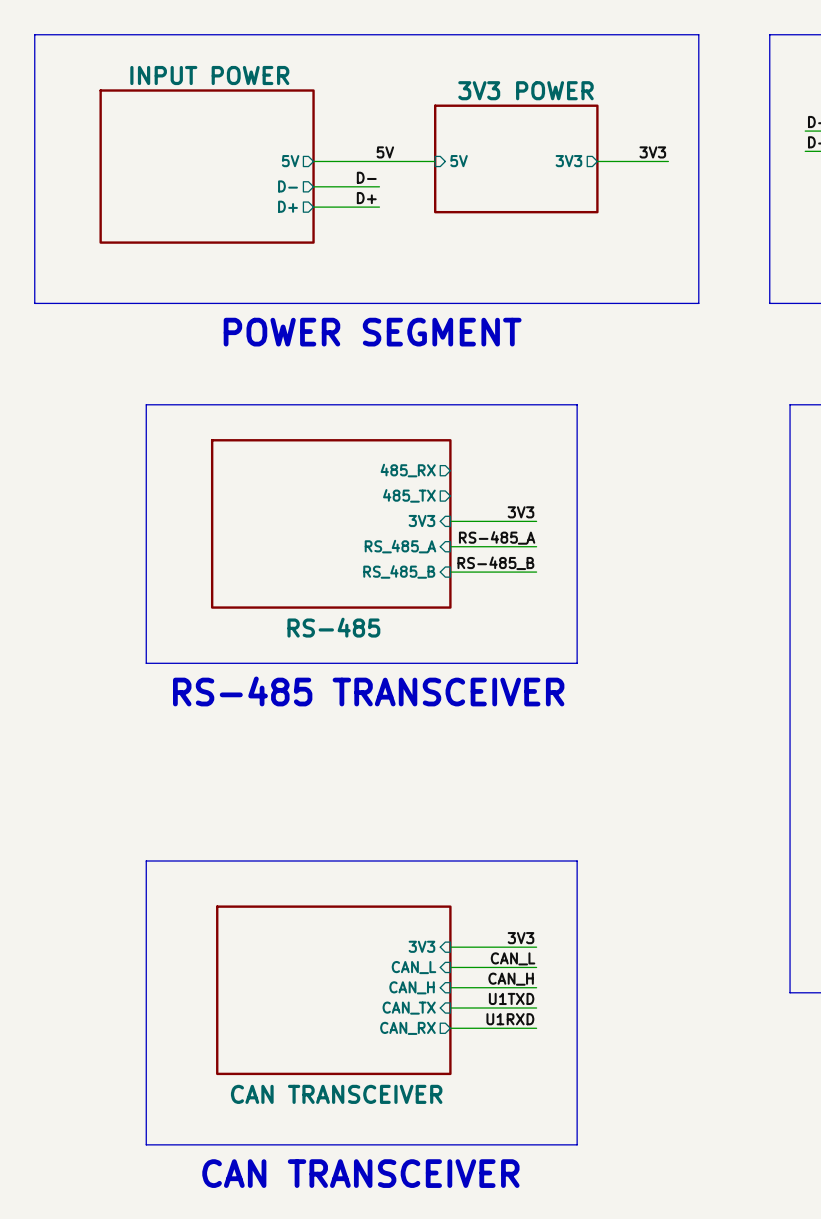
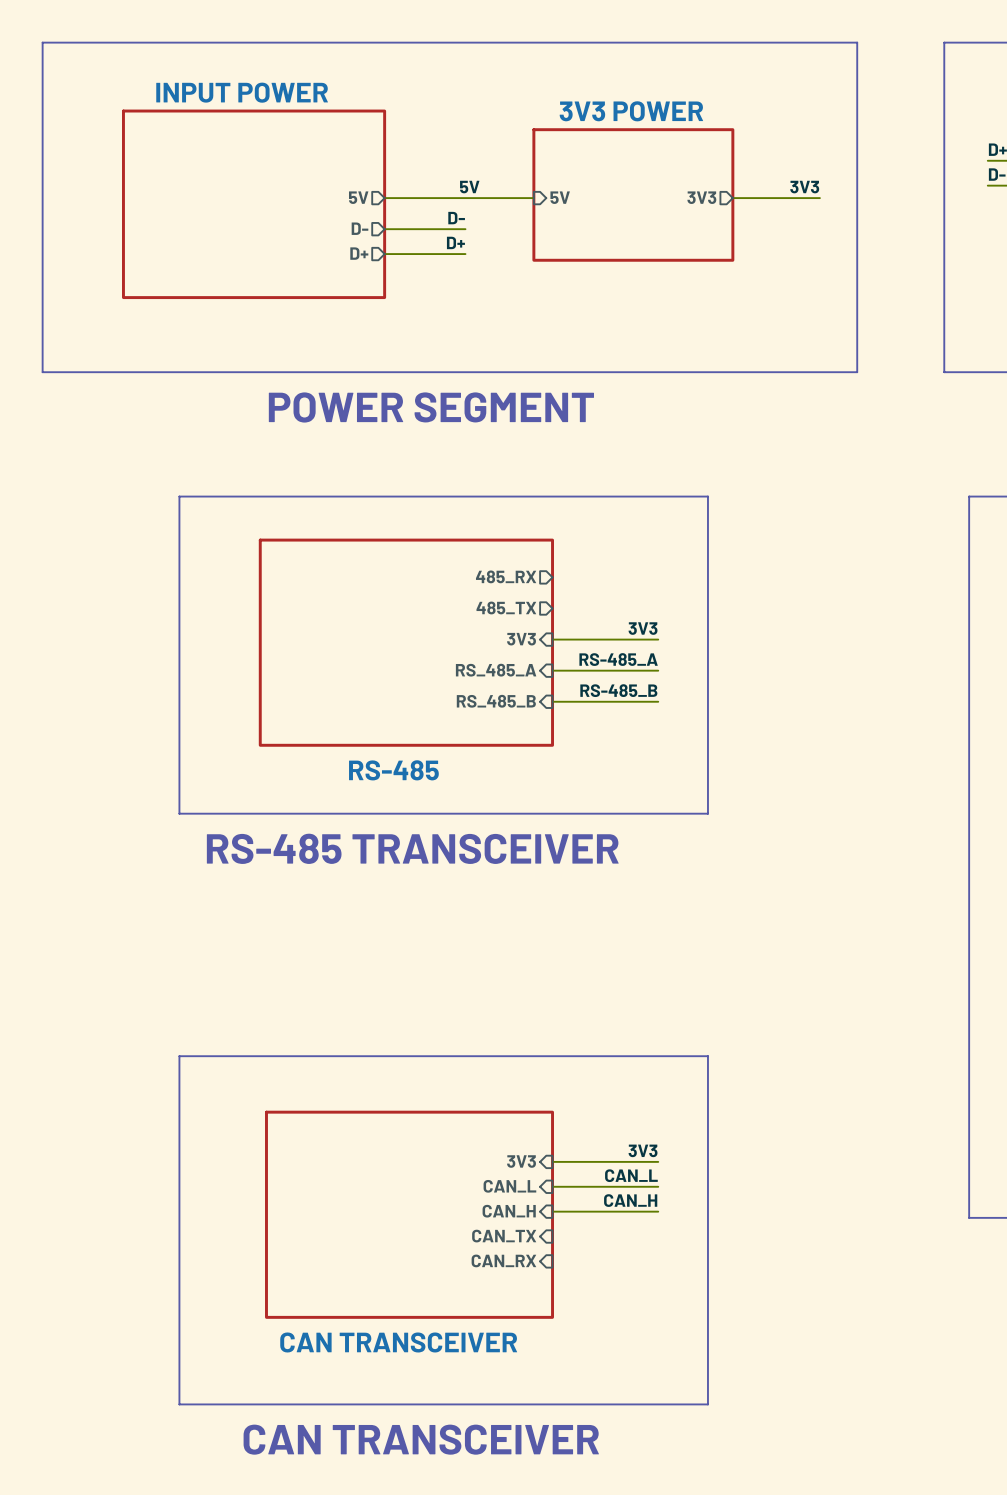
label: U1TXD (511, 998) -> none
wire: (450, 1008) (536, 1008) -> none
label: U1RXD (510, 1019) -> none
sheet pin shape: output (407, 1028) -> input (503, 1260)
wire: (450, 1028) (536, 1028) -> none

